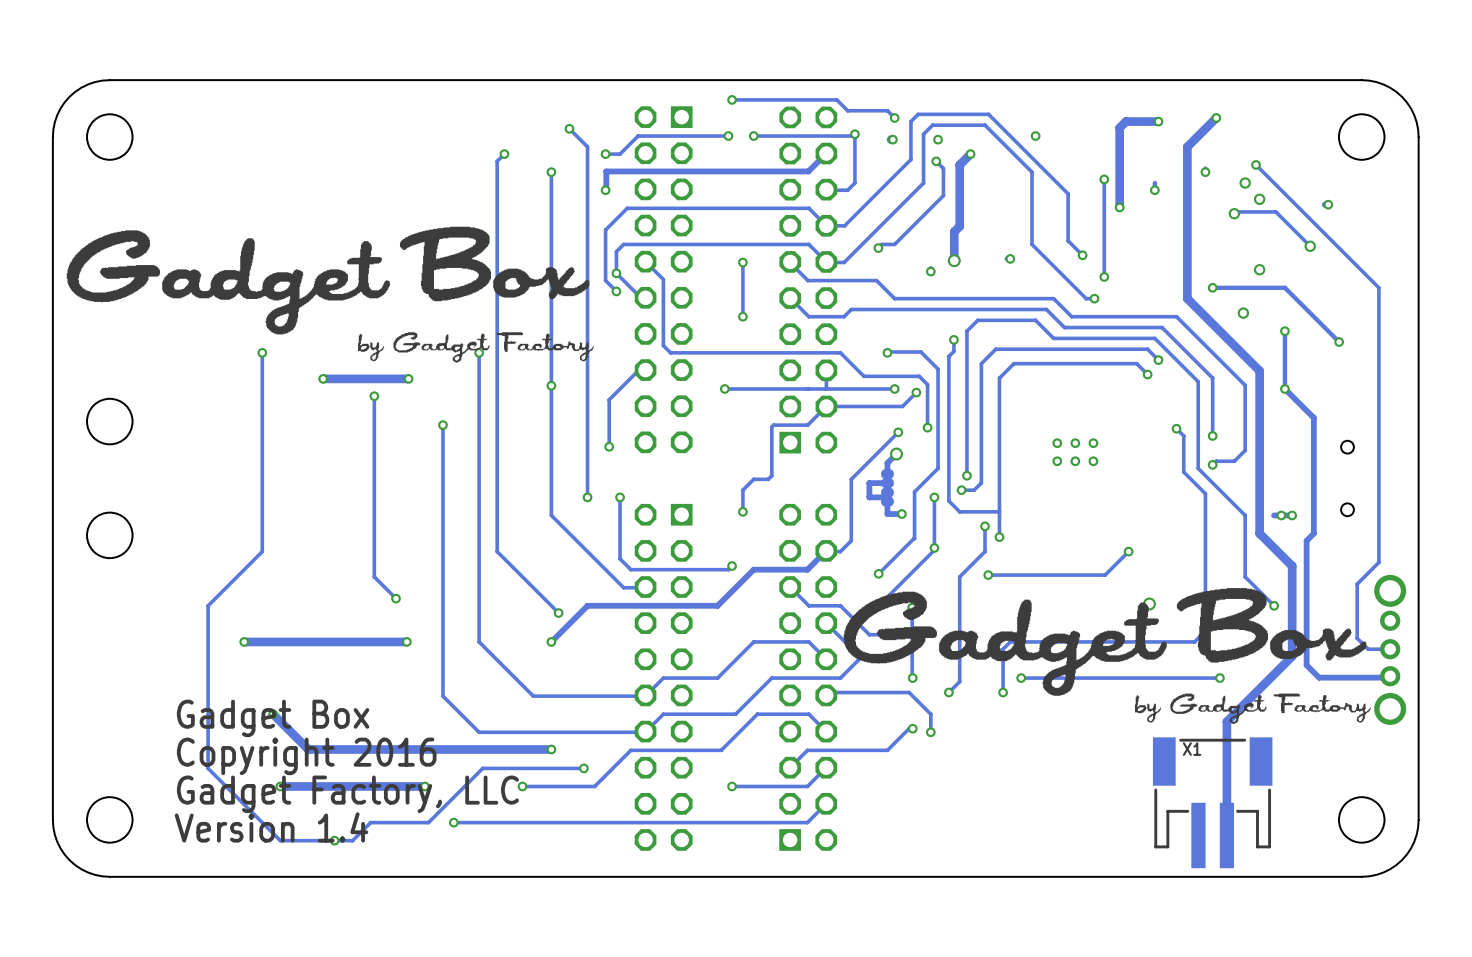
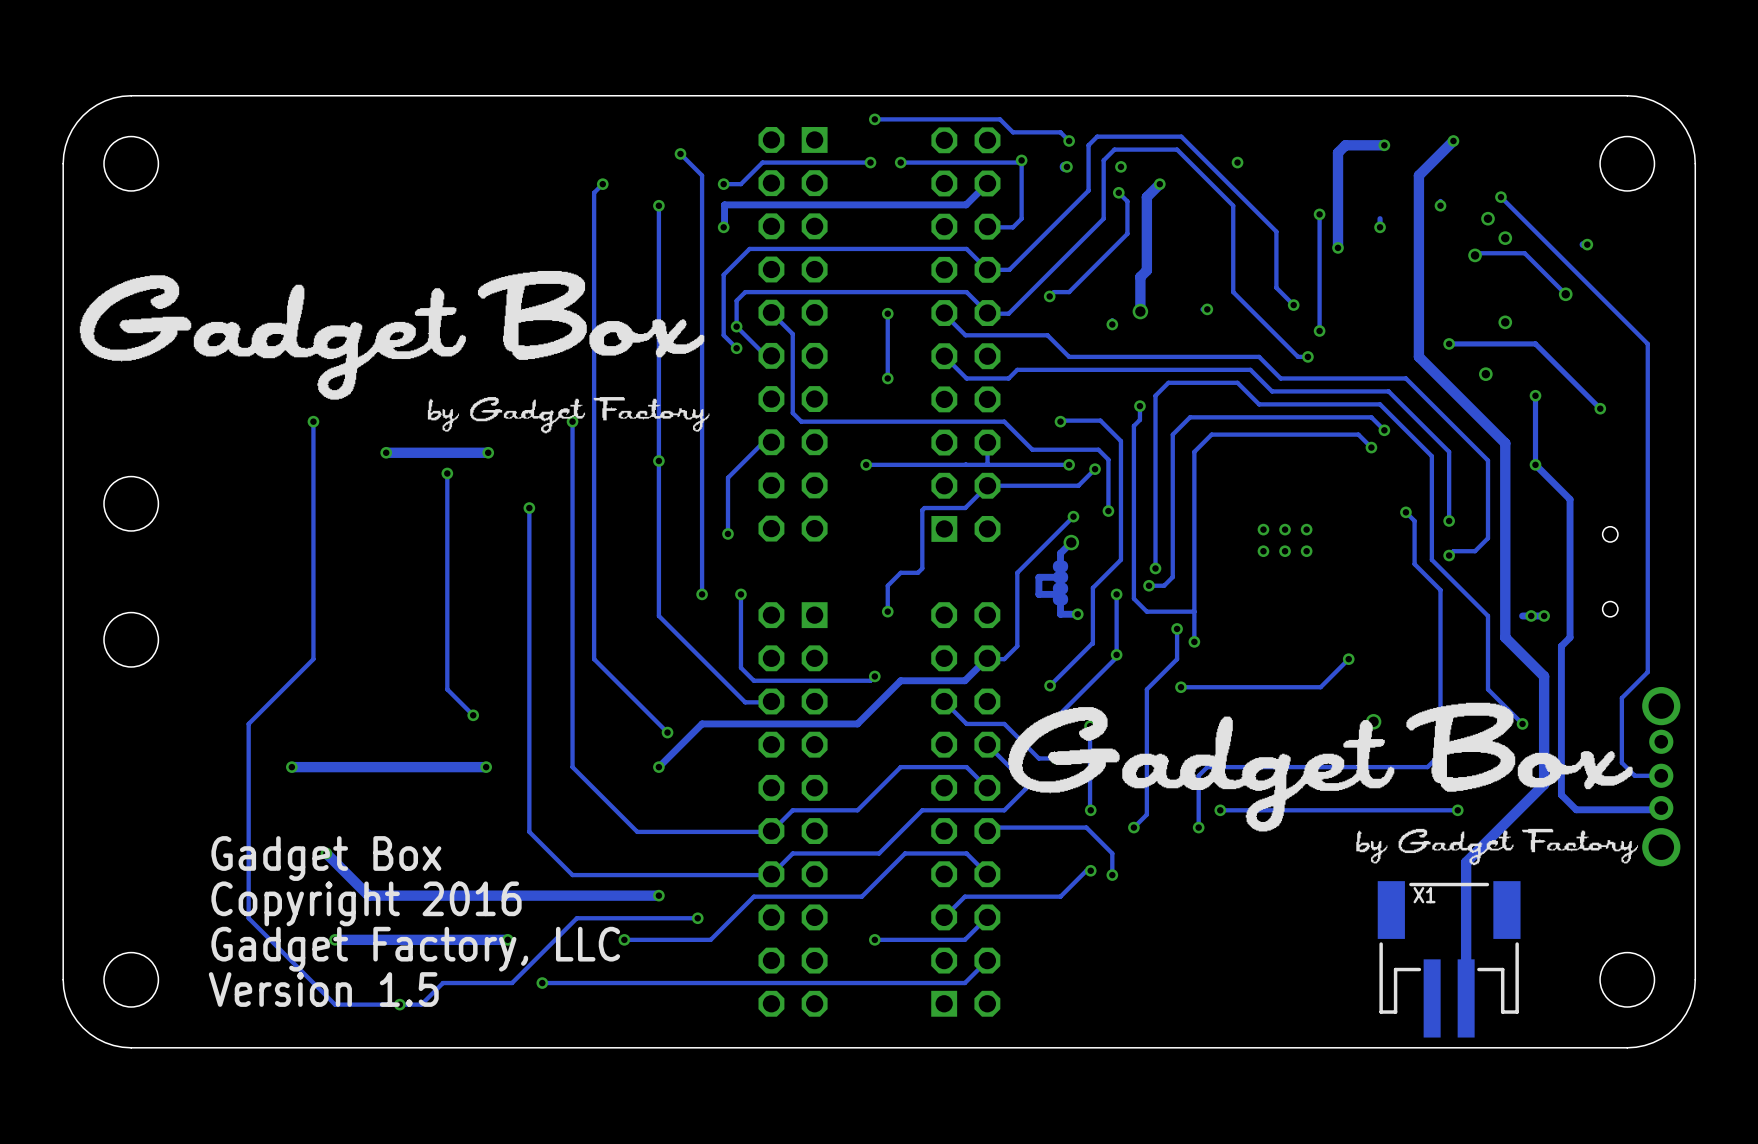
text: Version 1.4 (271, 827) -> Version 1.5 (323, 989)

